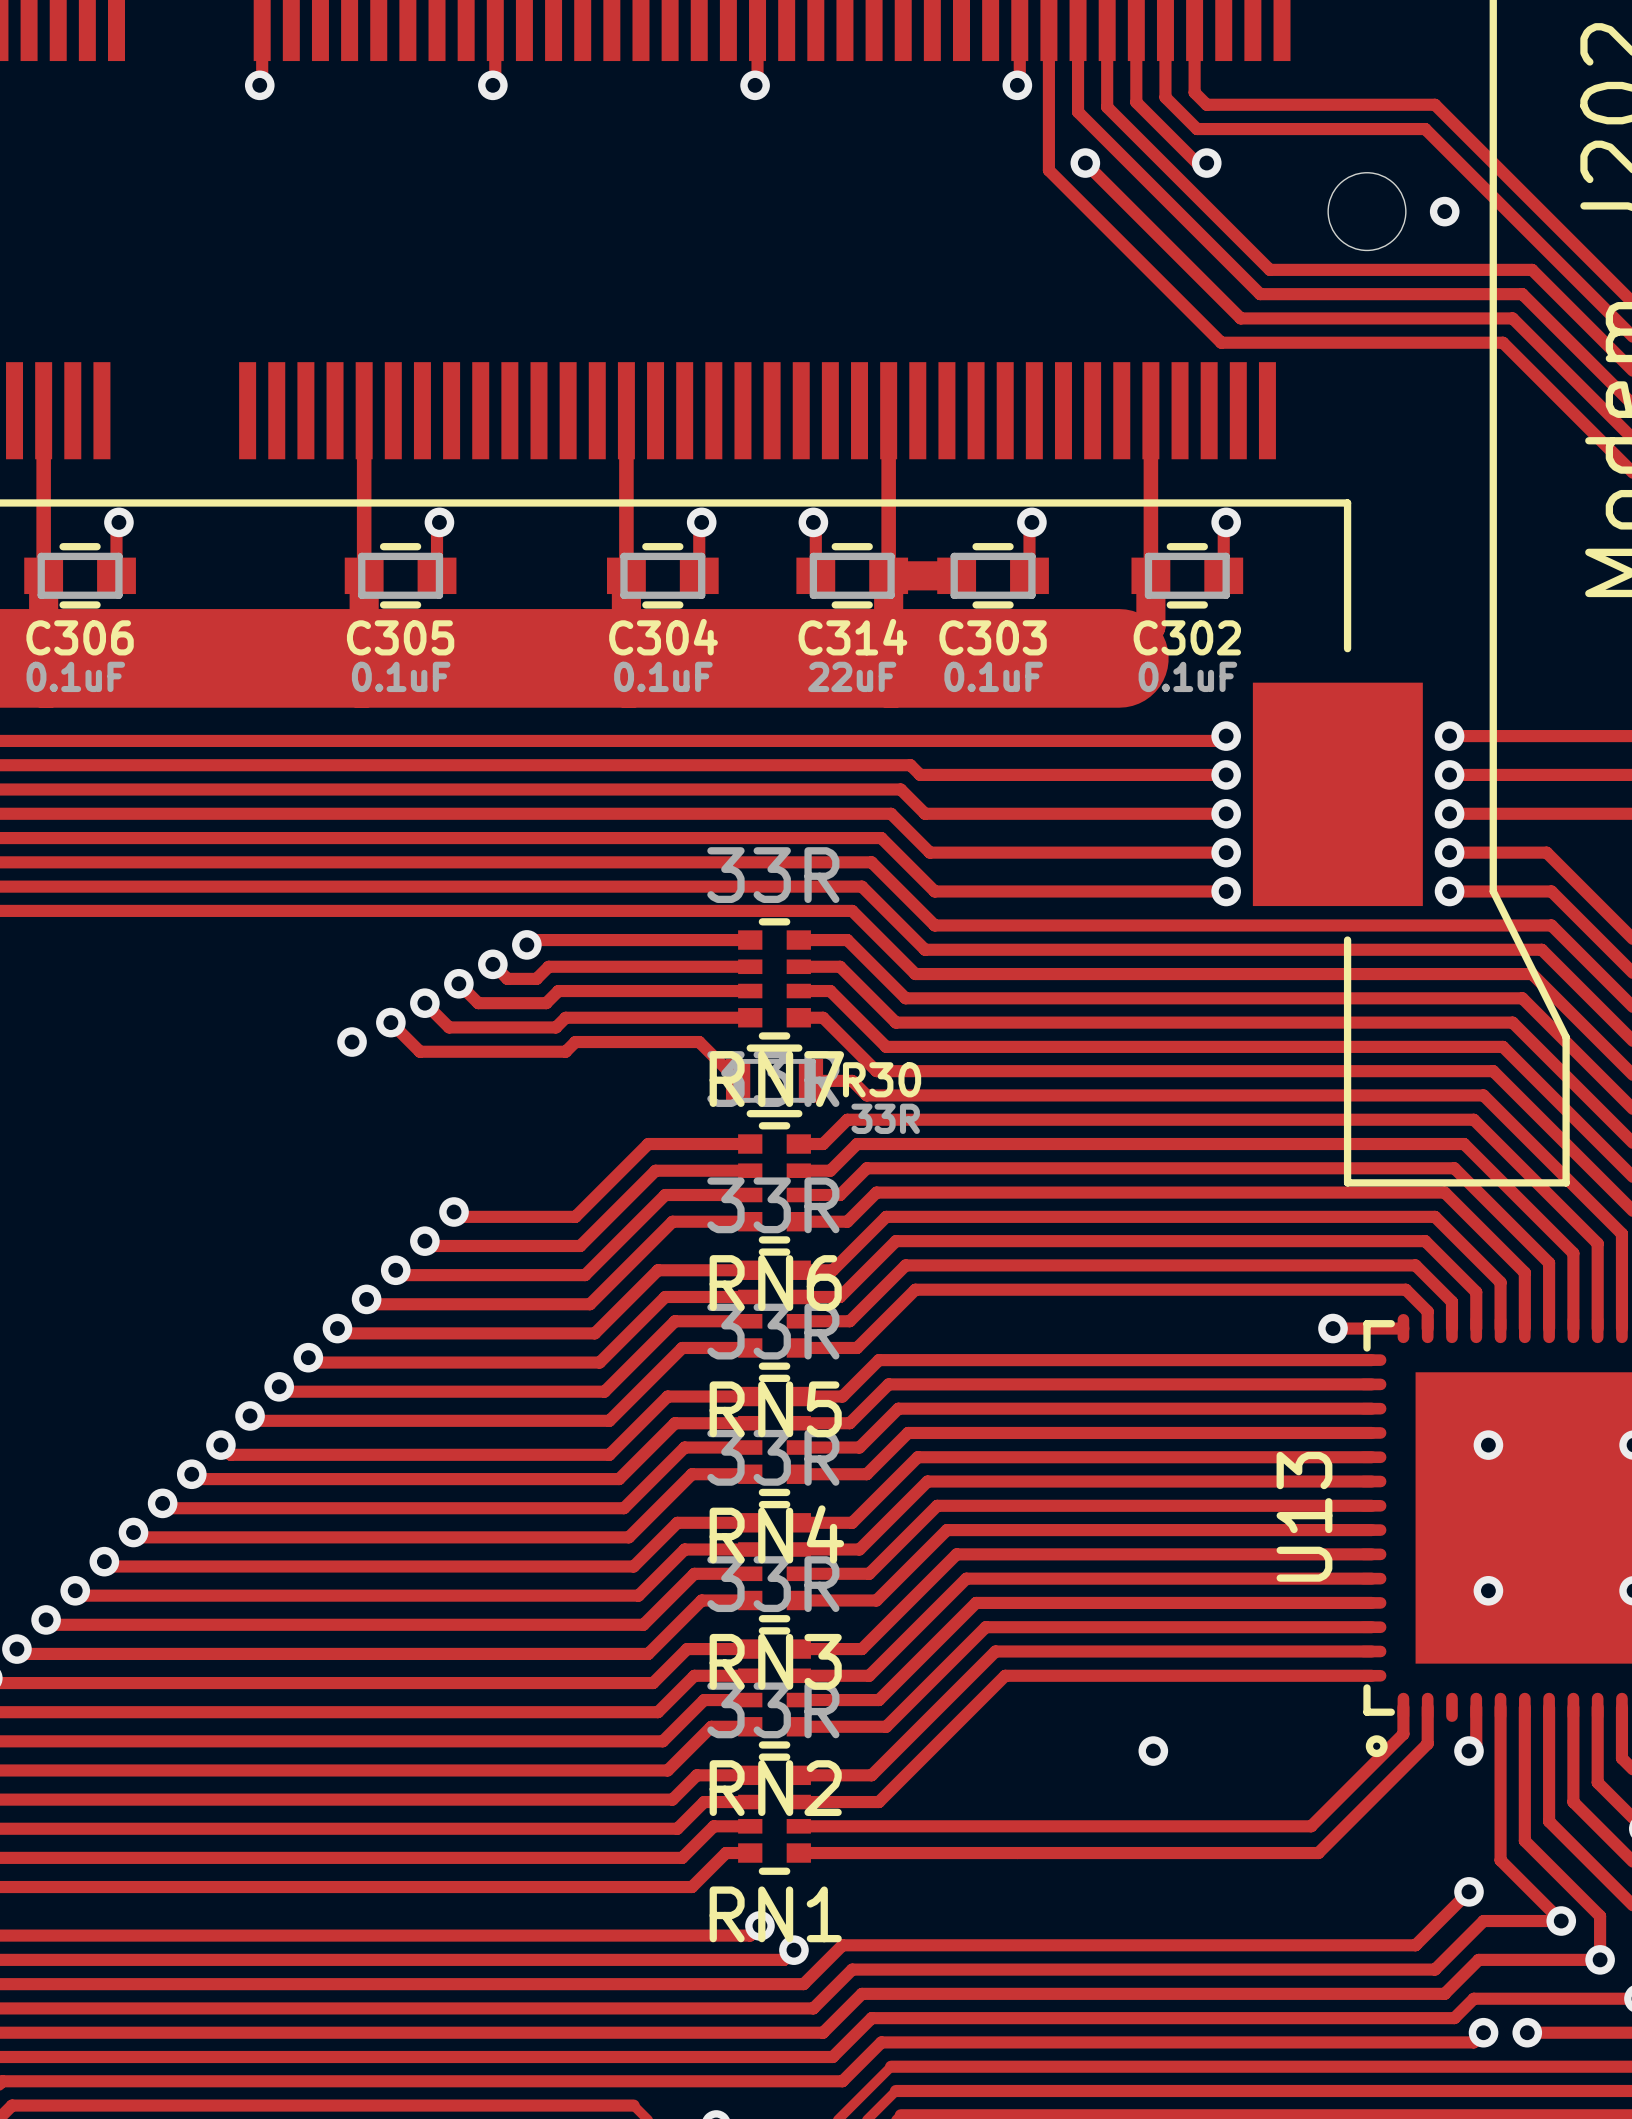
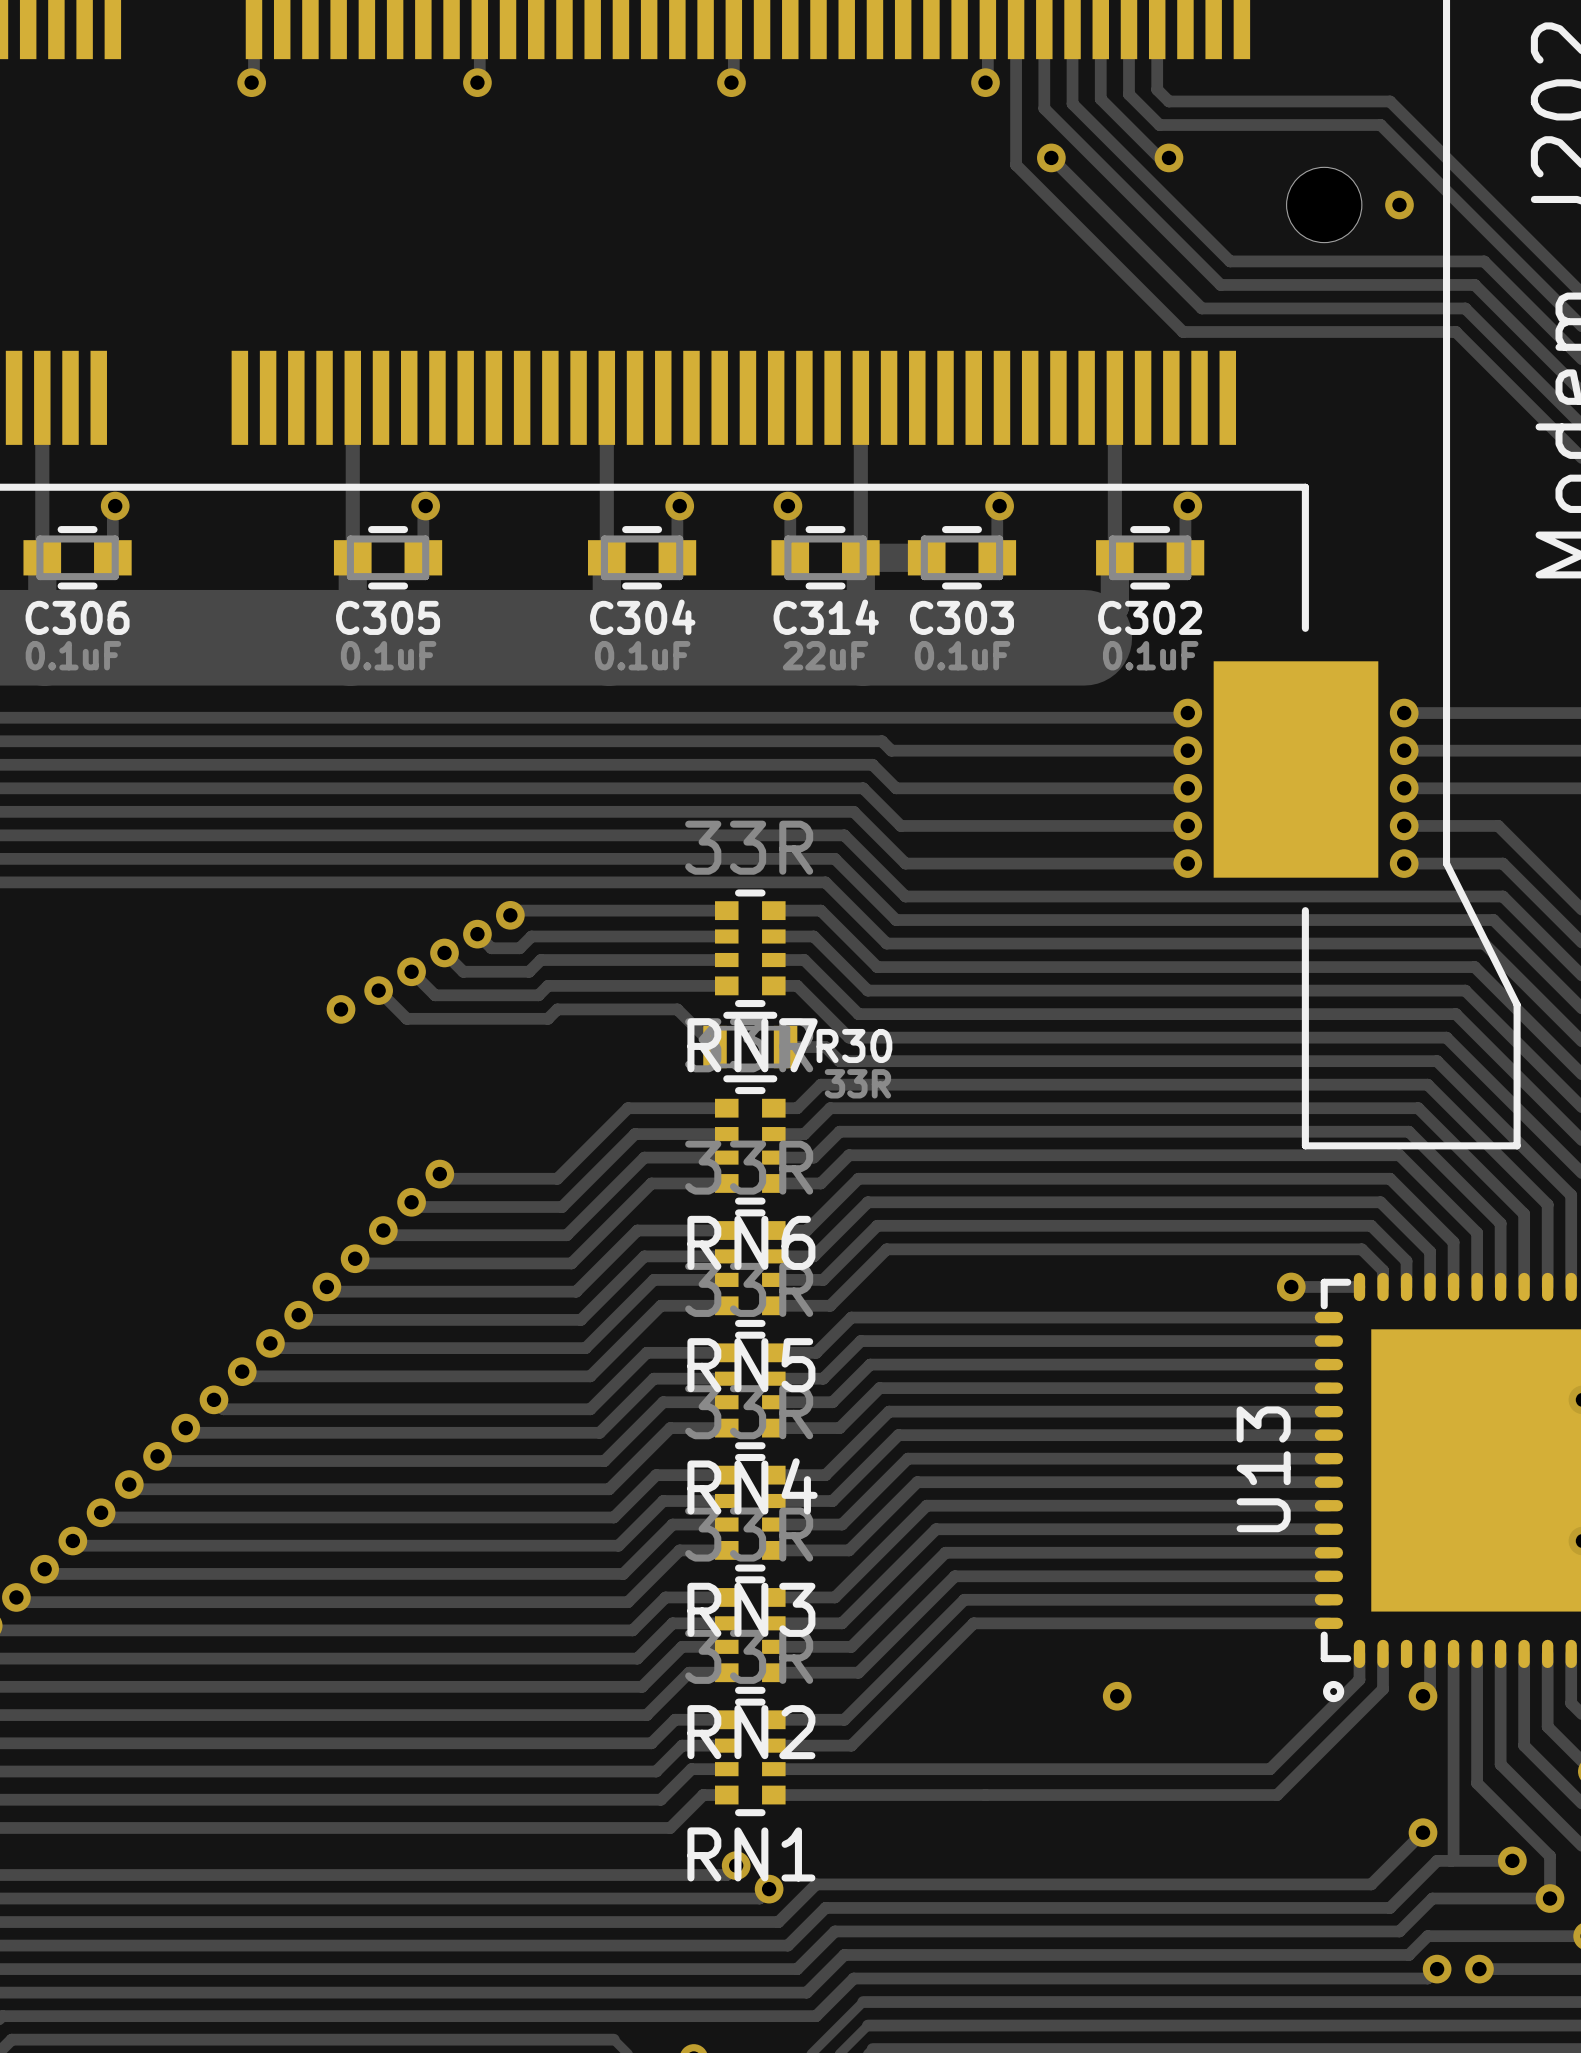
via: (1488, 1445) -> none
via: (1488, 1590) -> none
track: (1500, 1860) (1561, 1921) -> (1453, 1802) (1453, 1858) (1451, 1860)

